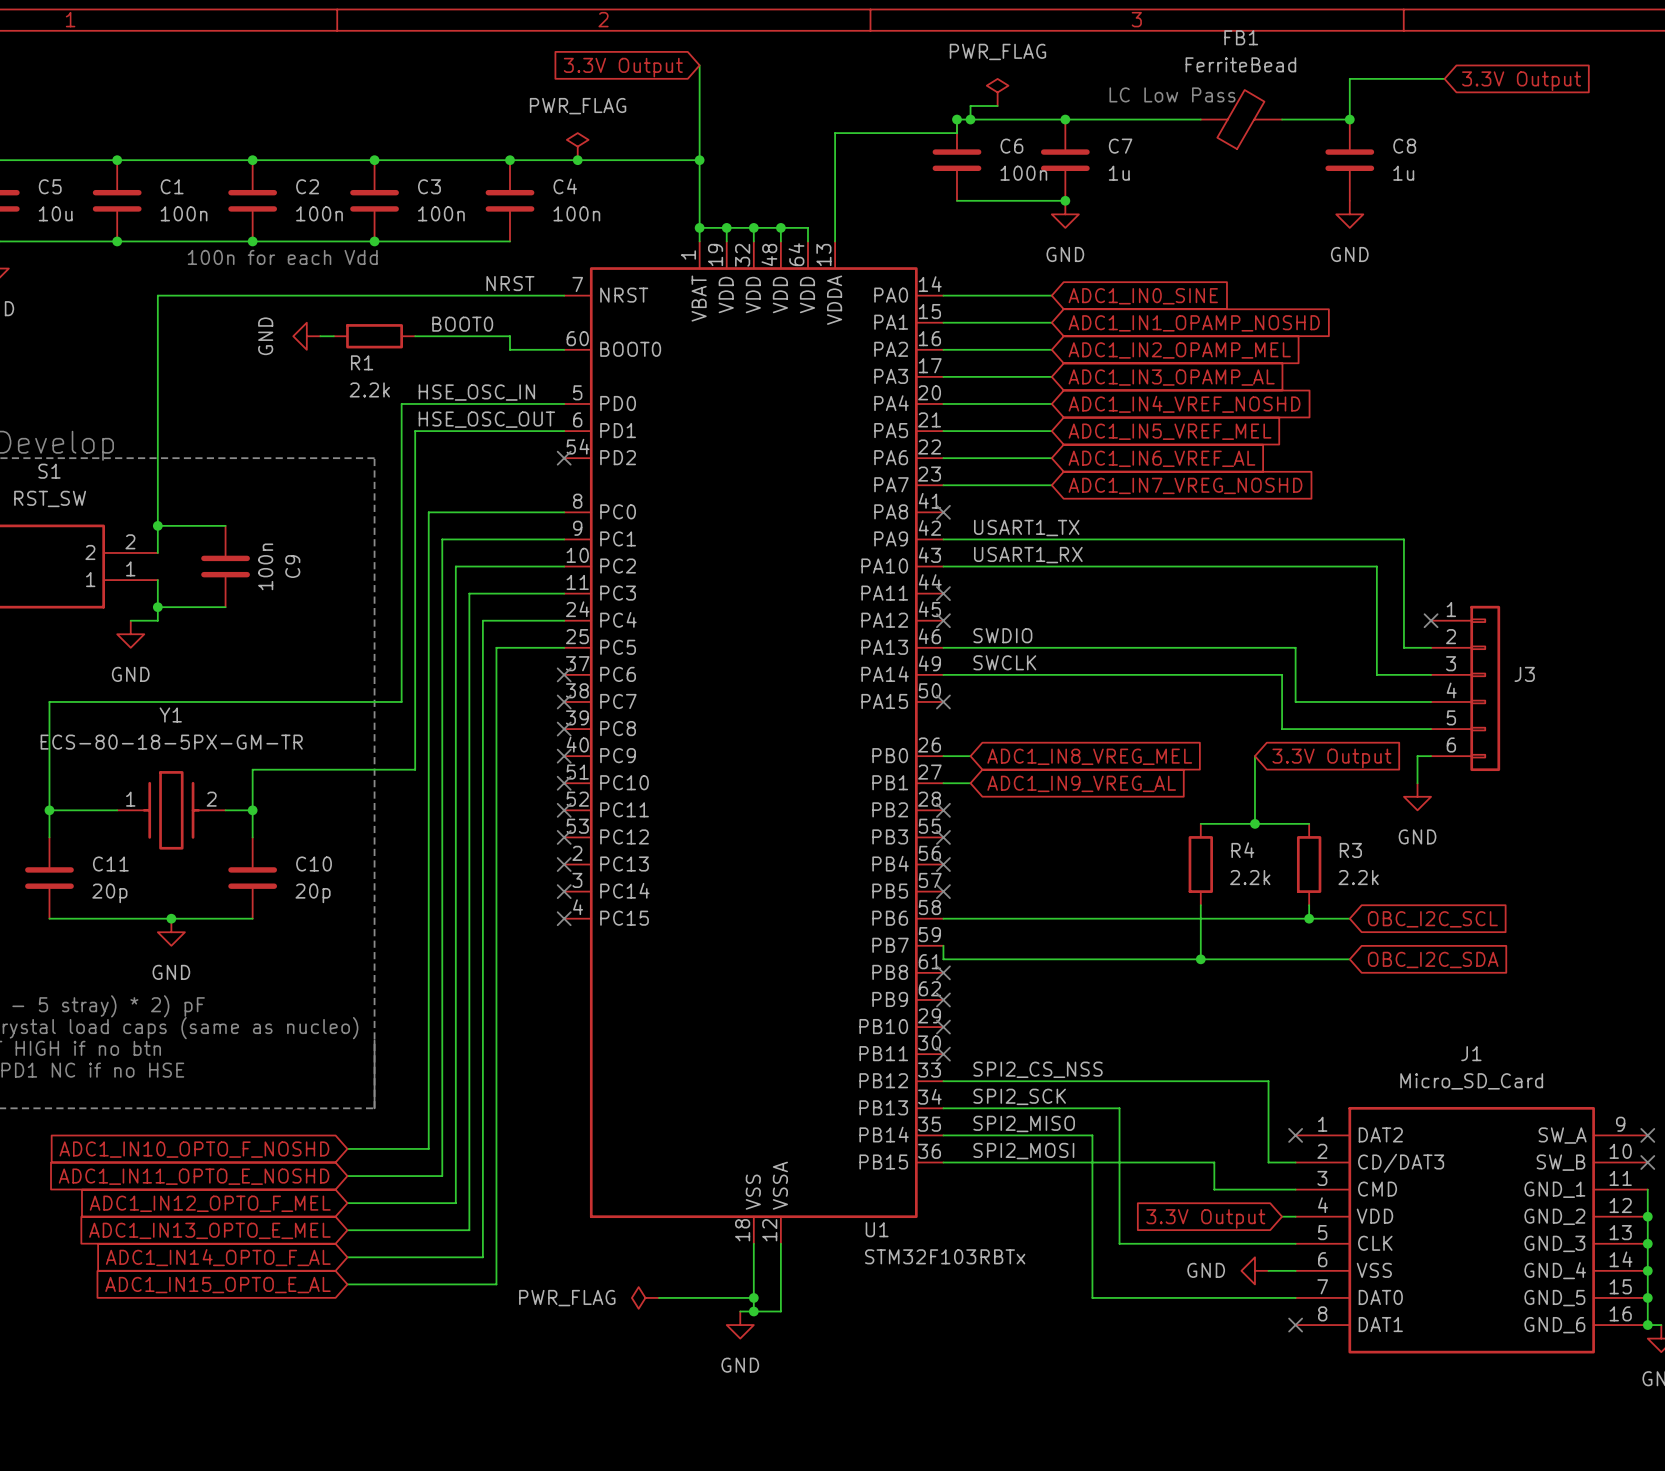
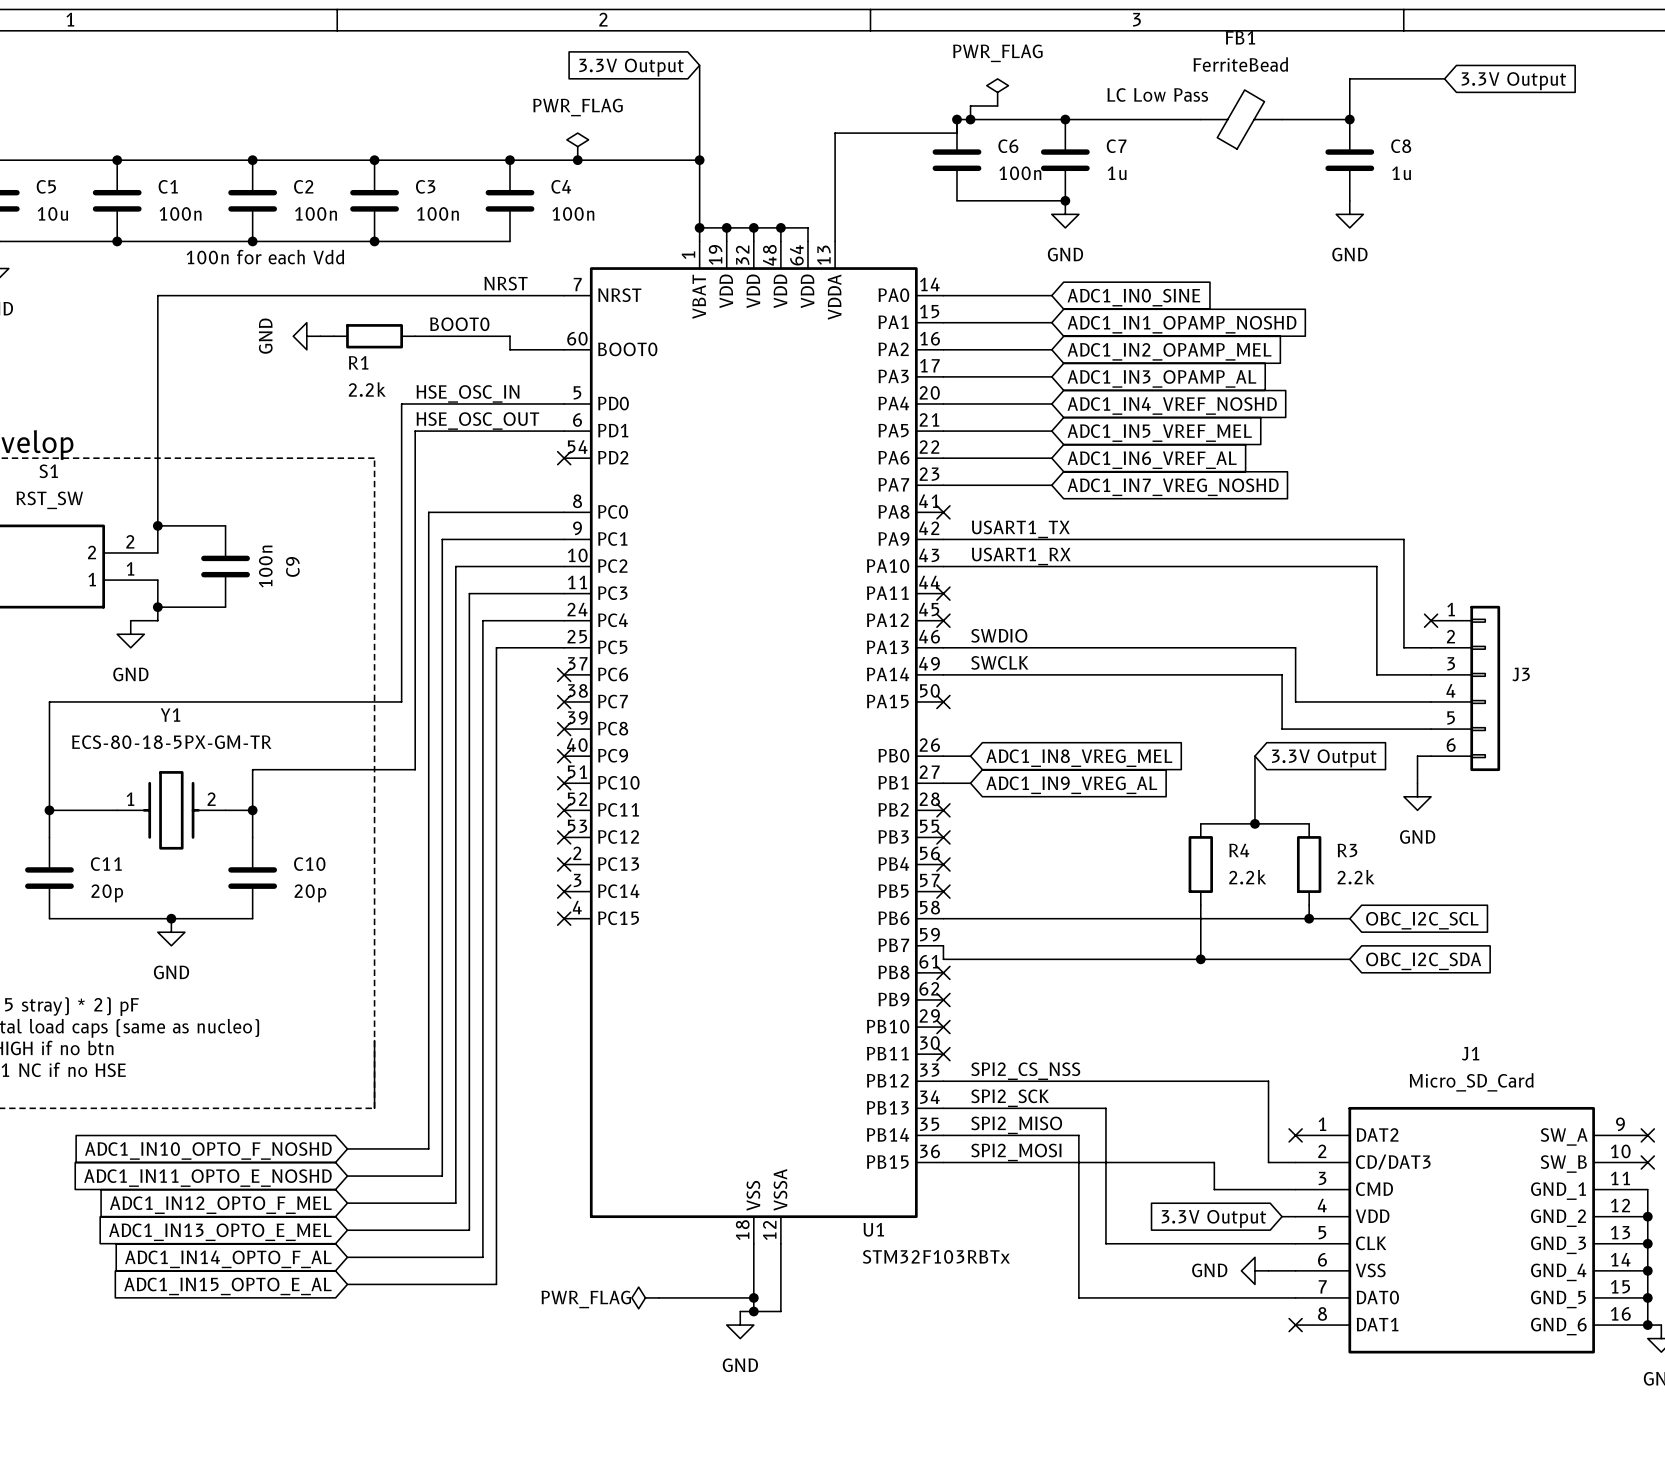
wire: (1105, 1108) (1119, 1108) (1119, 1243) -> (1105, 1108) (1105, 1243) (1119, 1243)
wire: (1078, 1135) (1092, 1135) (1092, 1297) -> (1078, 1135) (1078, 1297) (1092, 1297)
power symbol text position: PWR_FLAG (567, 1298) -> PWR_FLAG (586, 1299)

